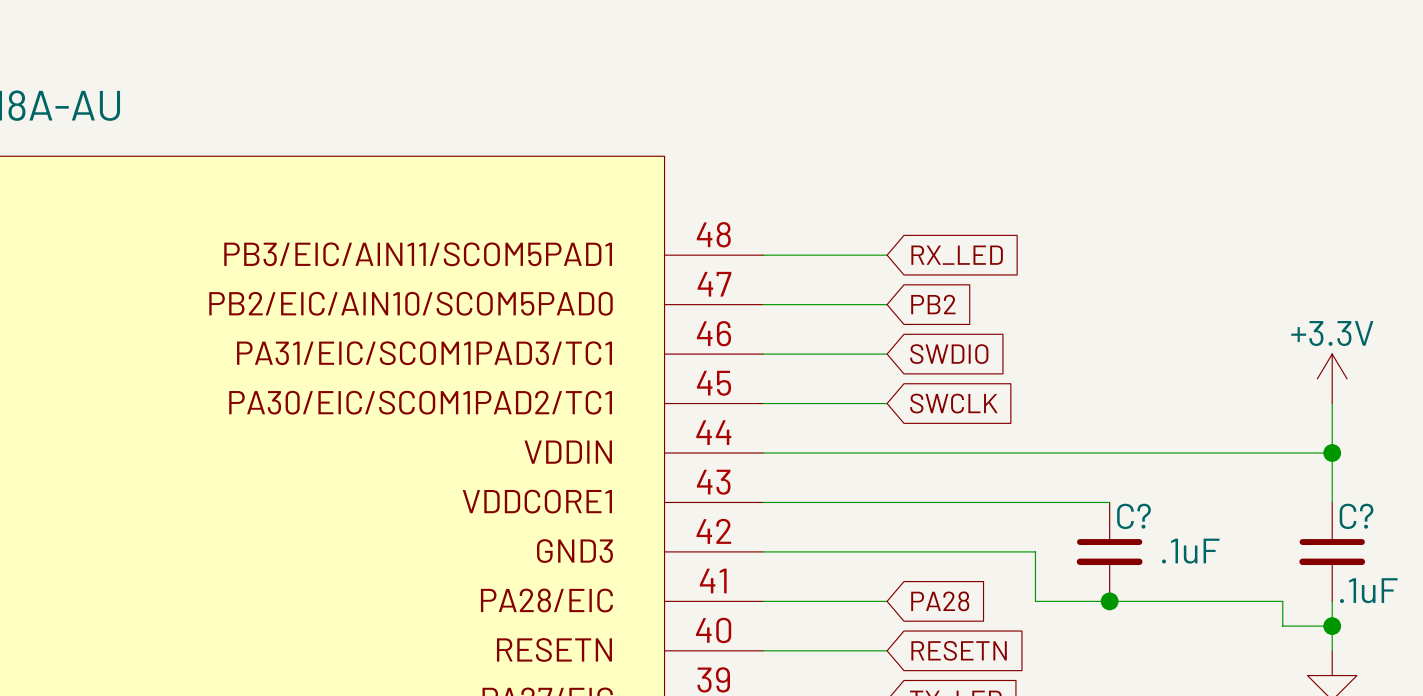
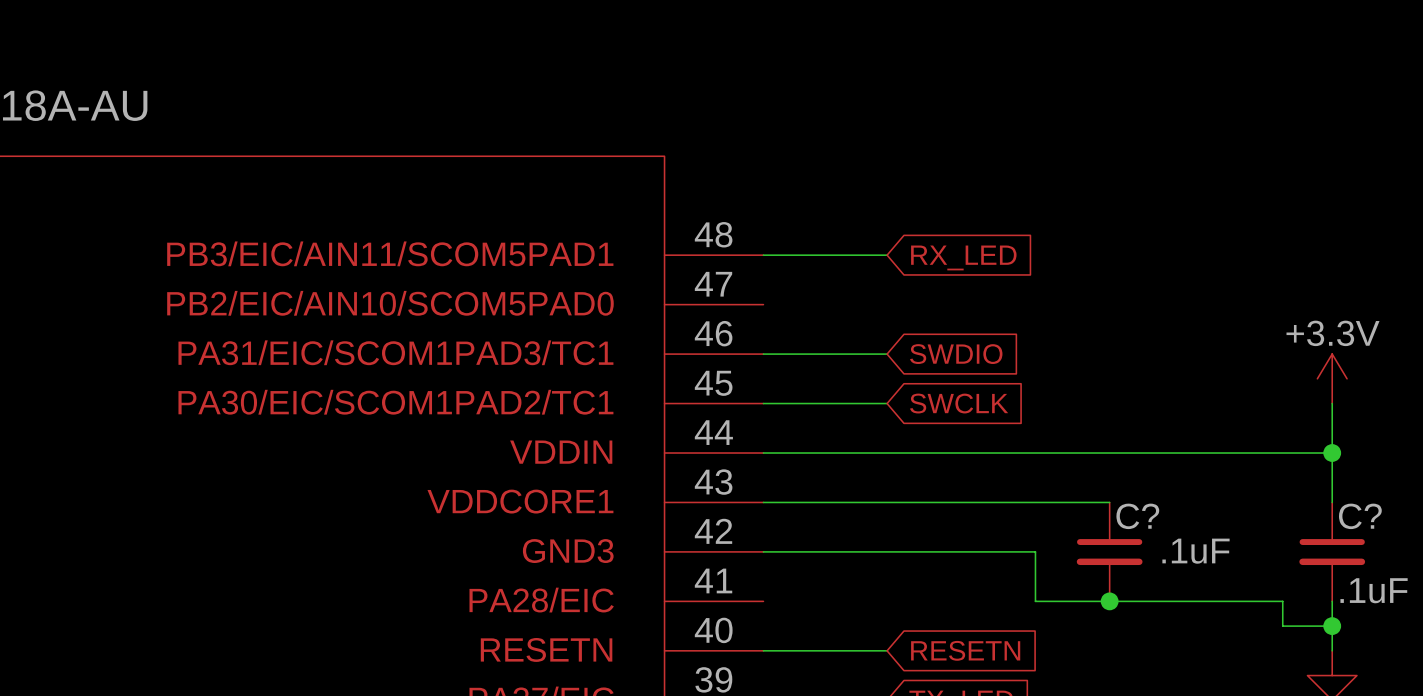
wire: (763, 304) (887, 304) -> none
global label: PB2 (933, 304) -> none
wire: (763, 601) (887, 601) -> none
global label: PA28 (940, 601) -> none

